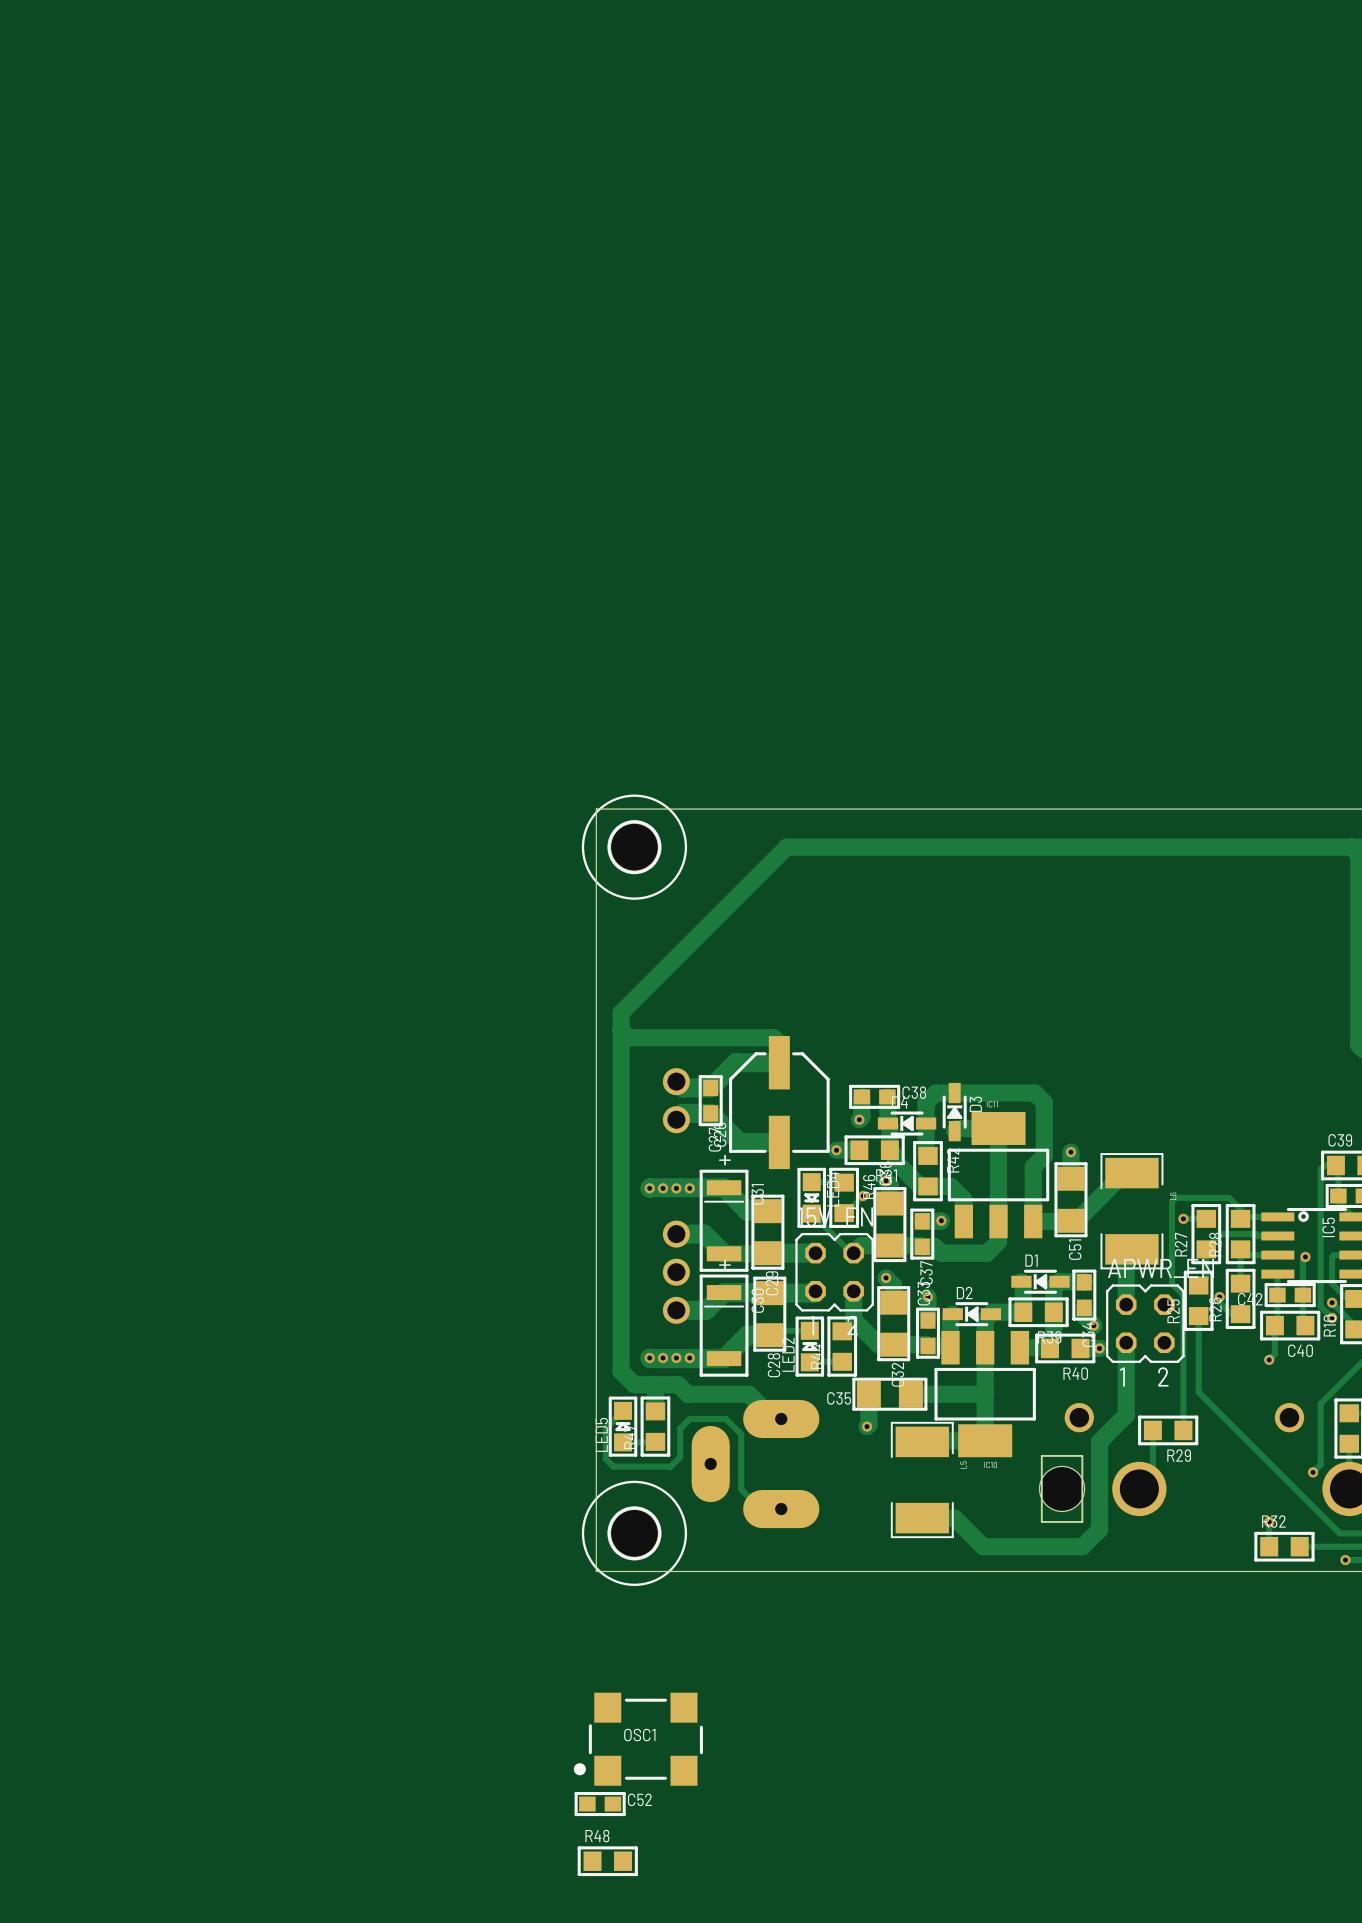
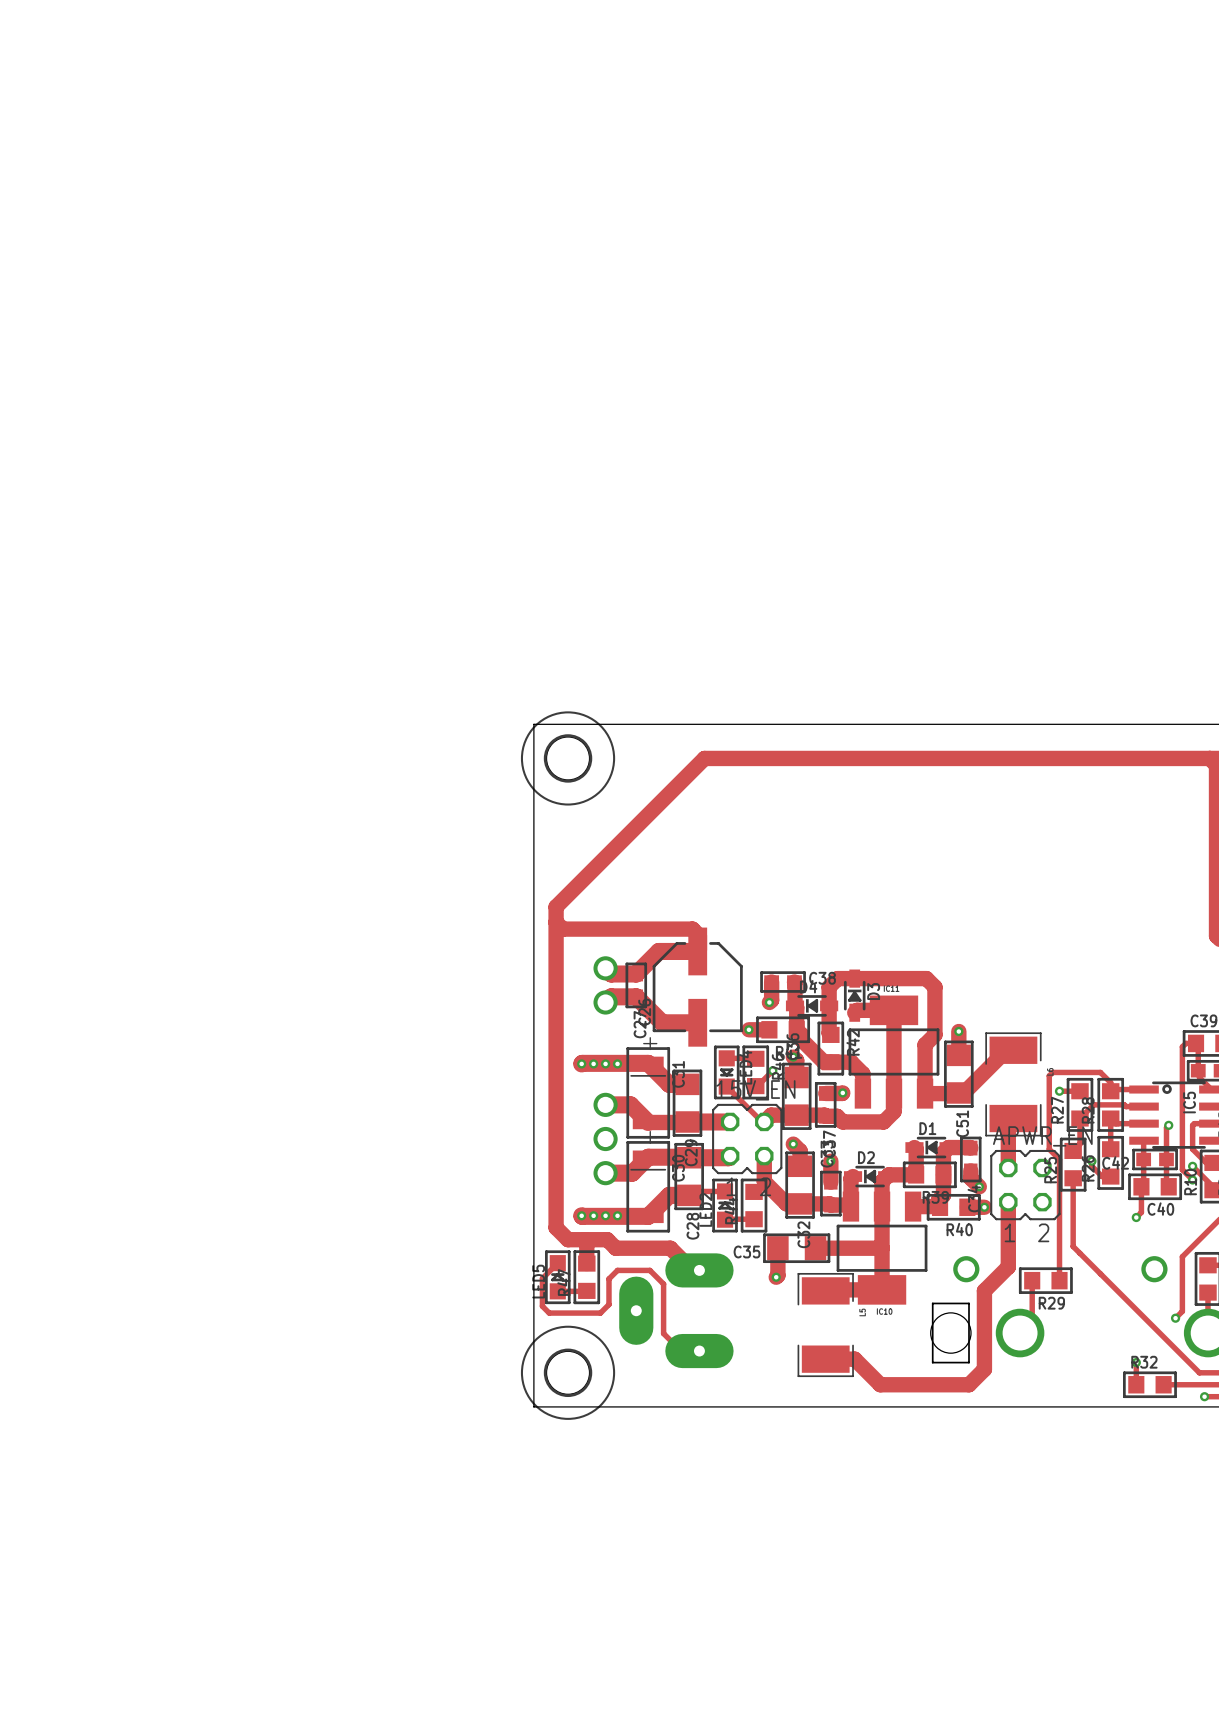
OSC1: (638, 1739) -> none
C52: (600, 1804) -> none
R48: (607, 1861) -> none

